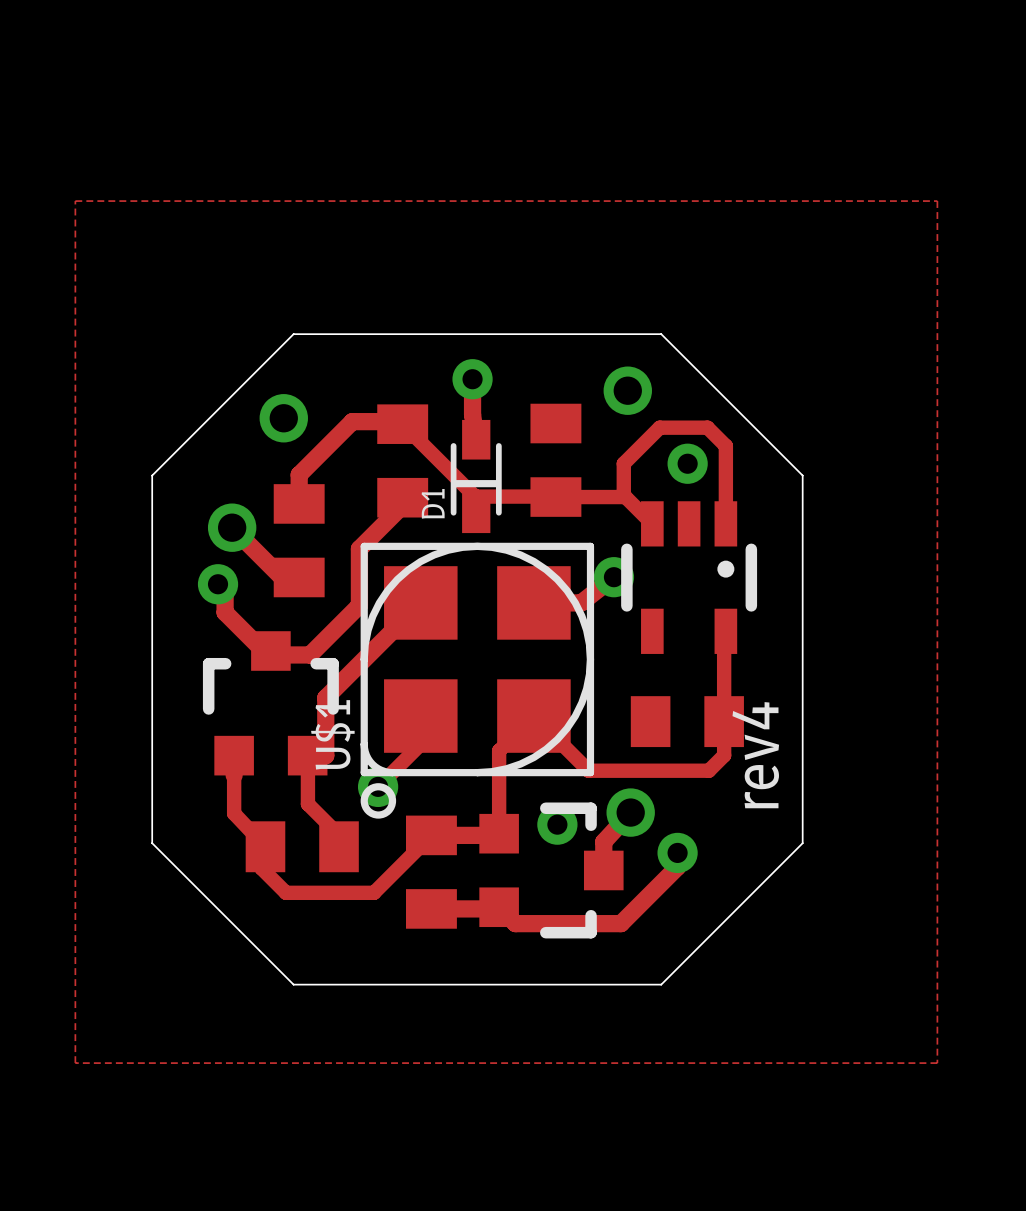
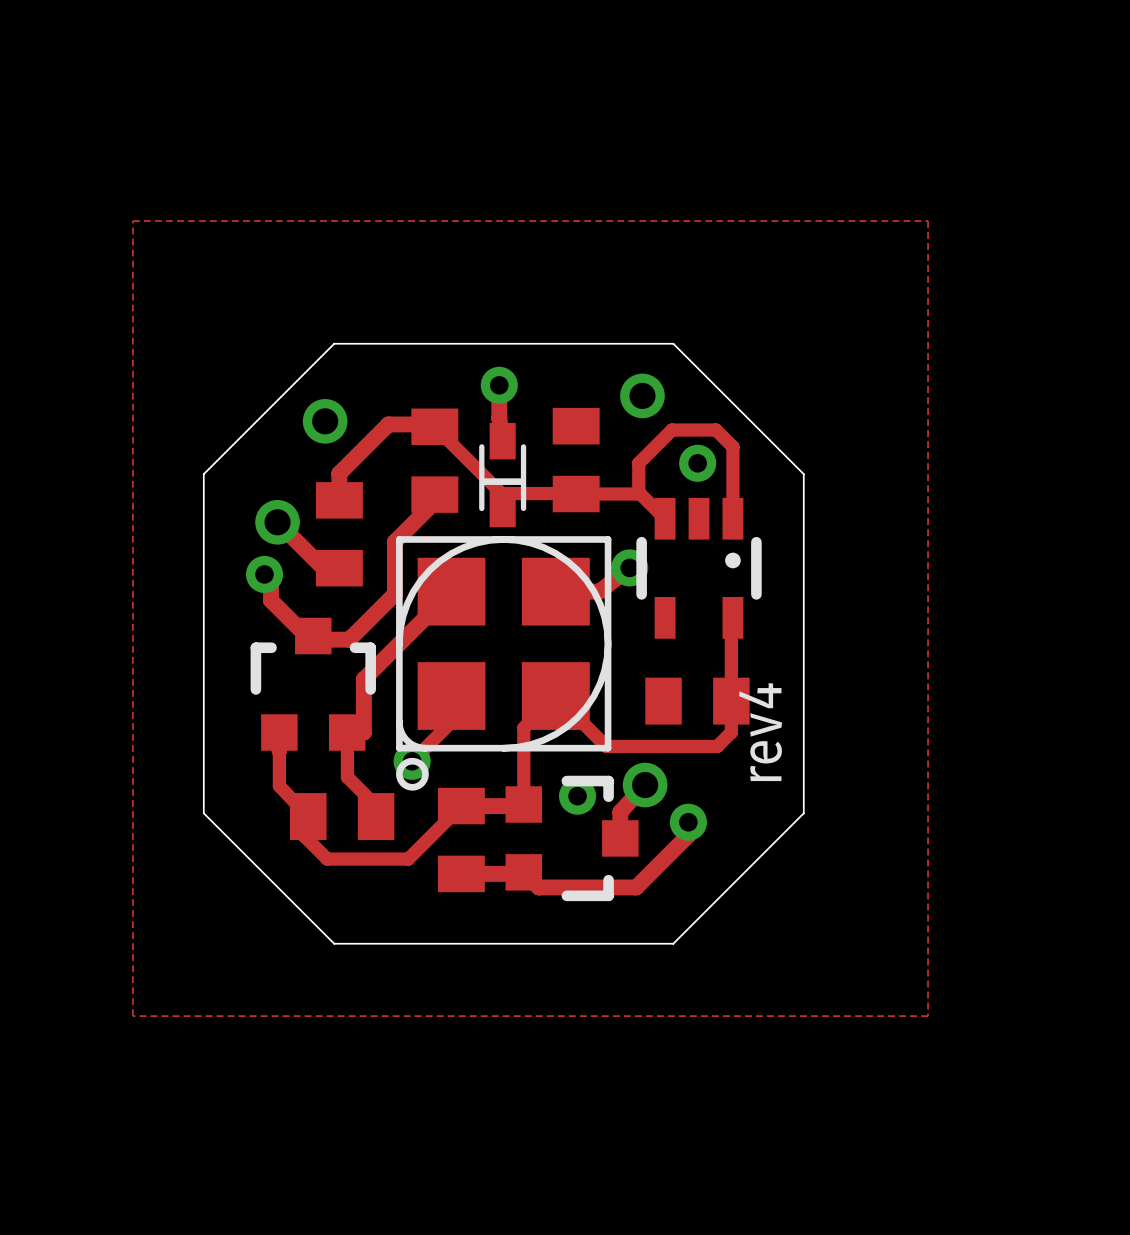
D1 name: D1 (433, 503) -> none
U$1 name: U$1 (332, 734) -> none

